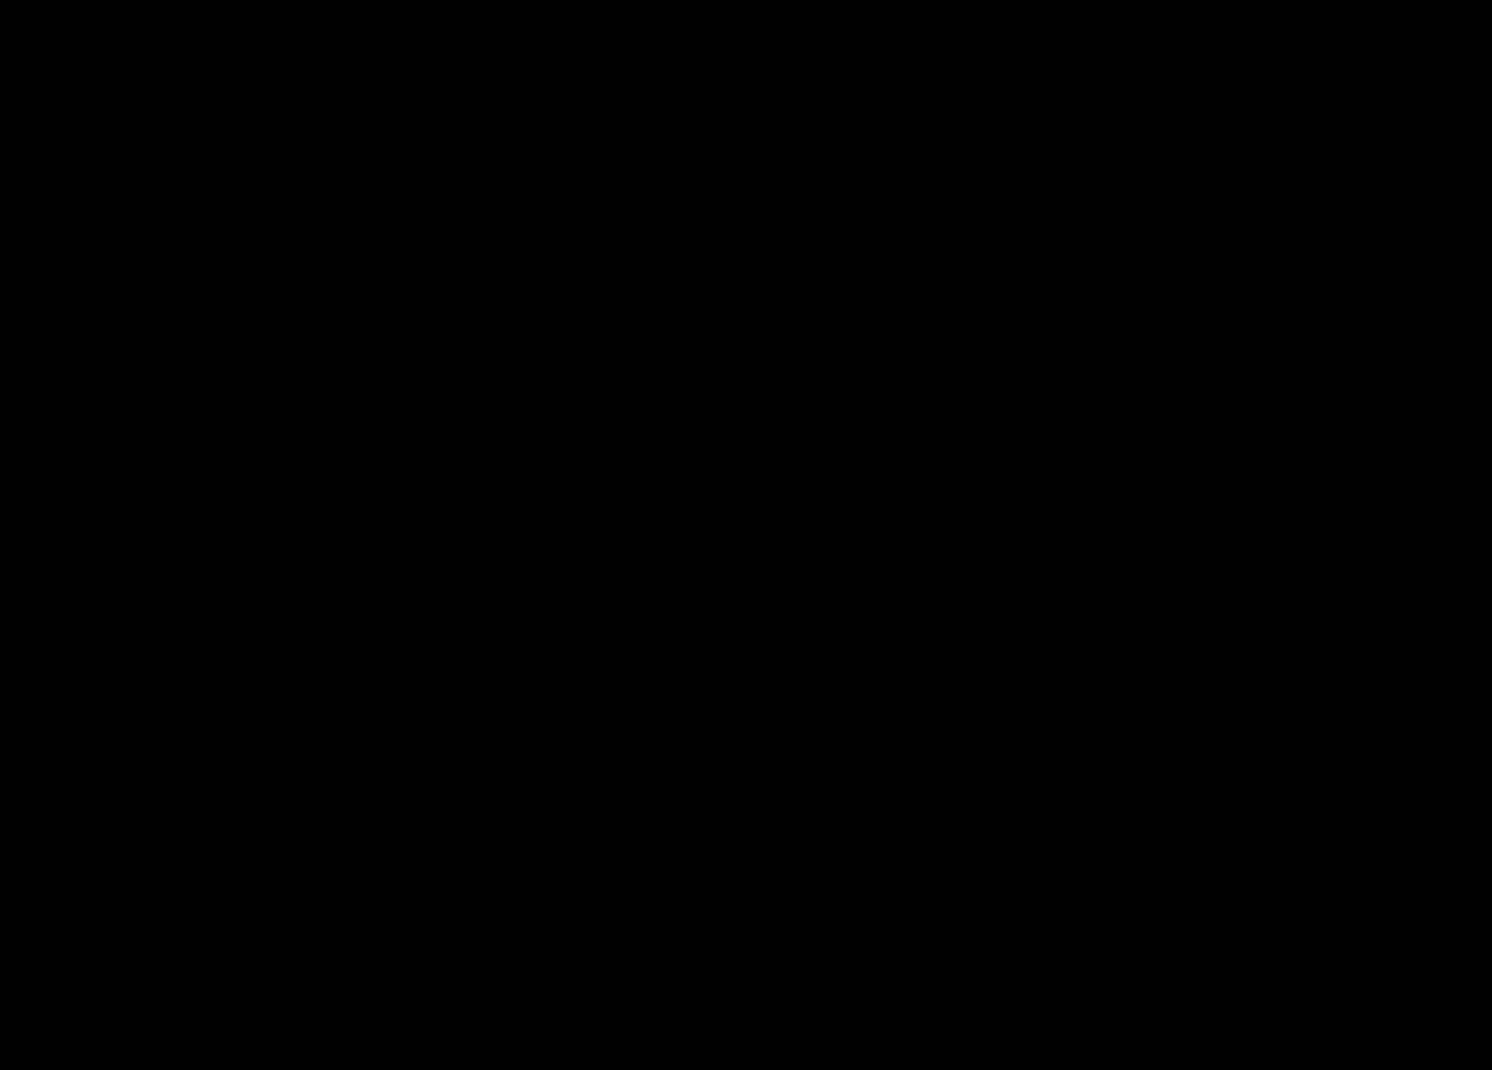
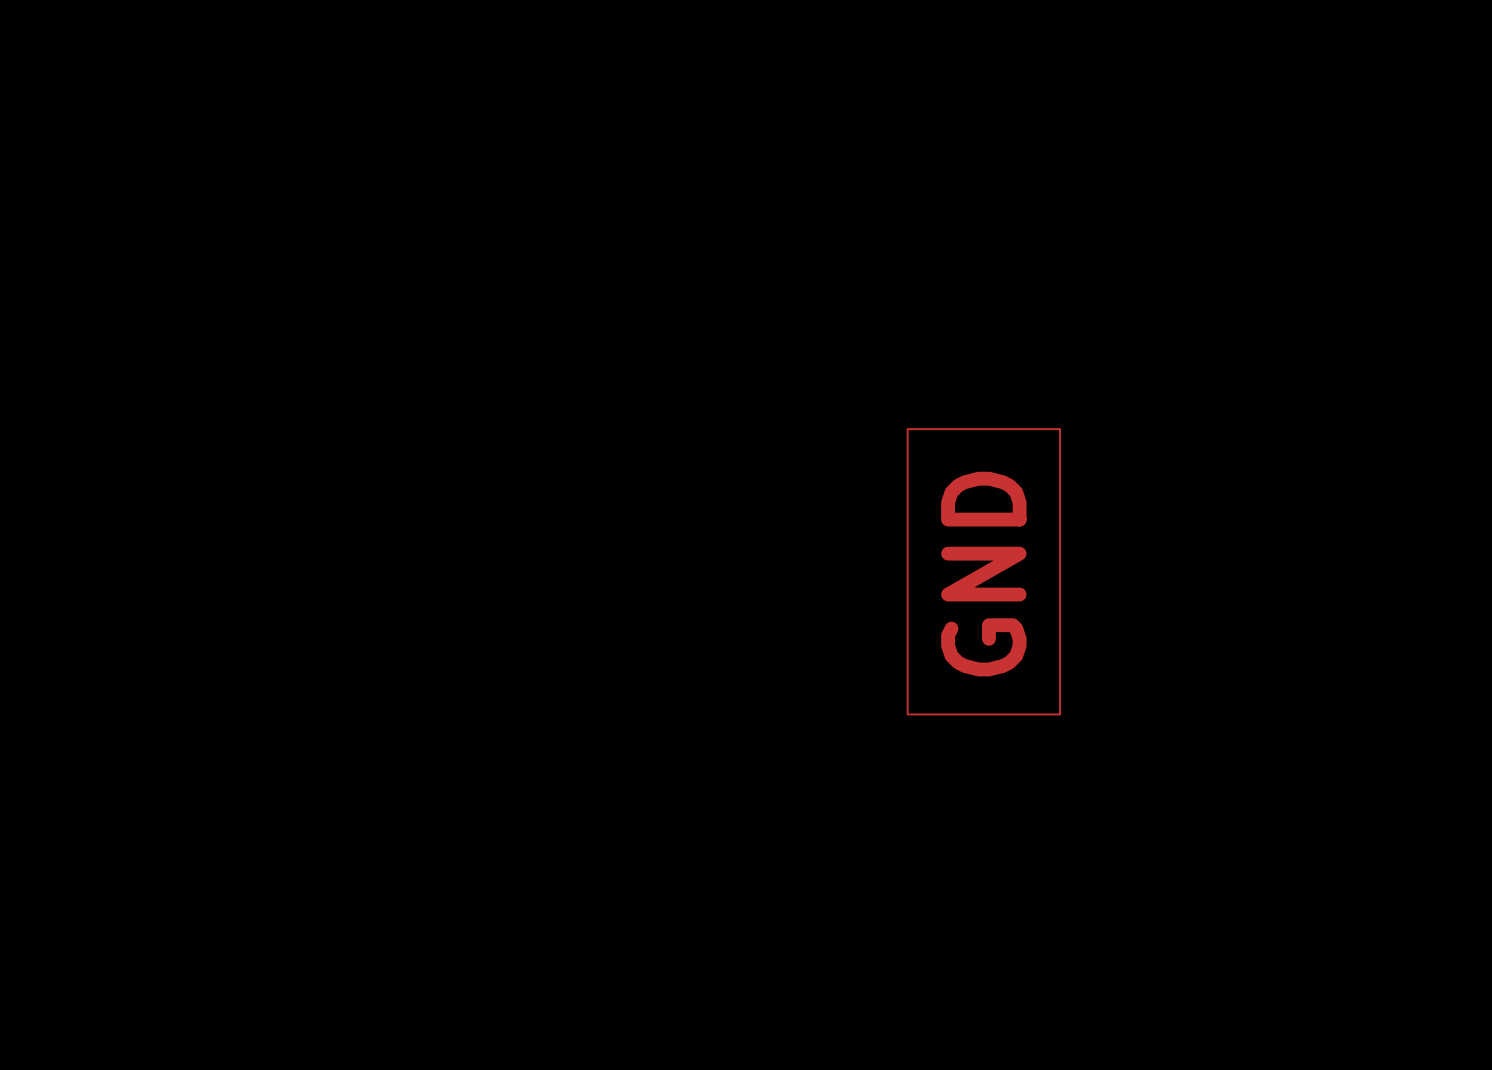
global label: none -> GND (983, 574)

